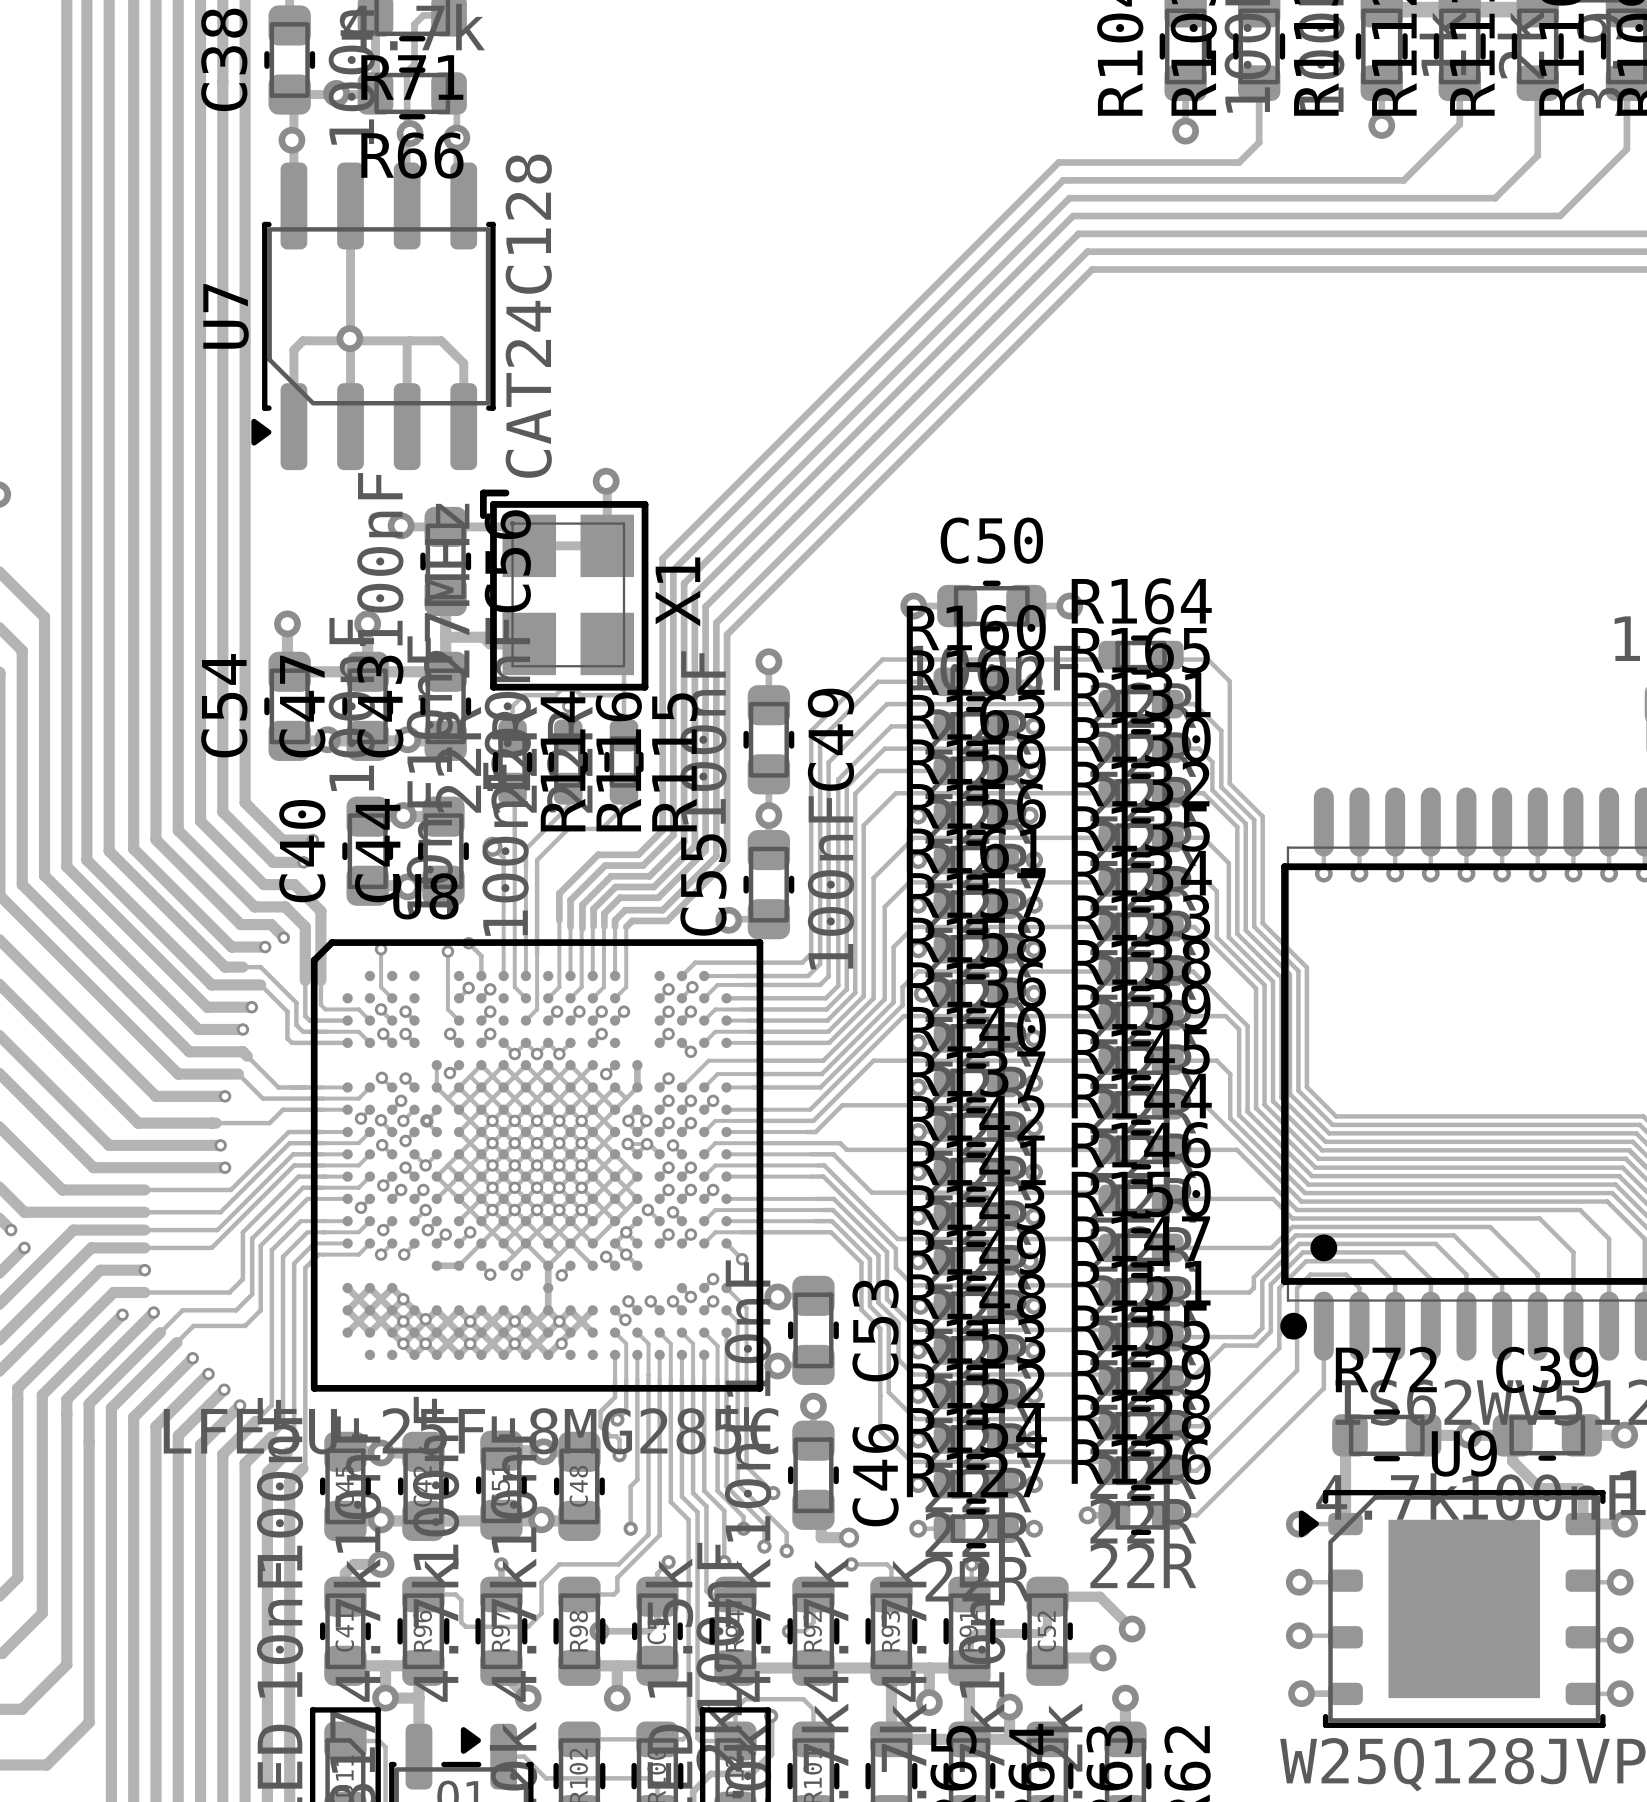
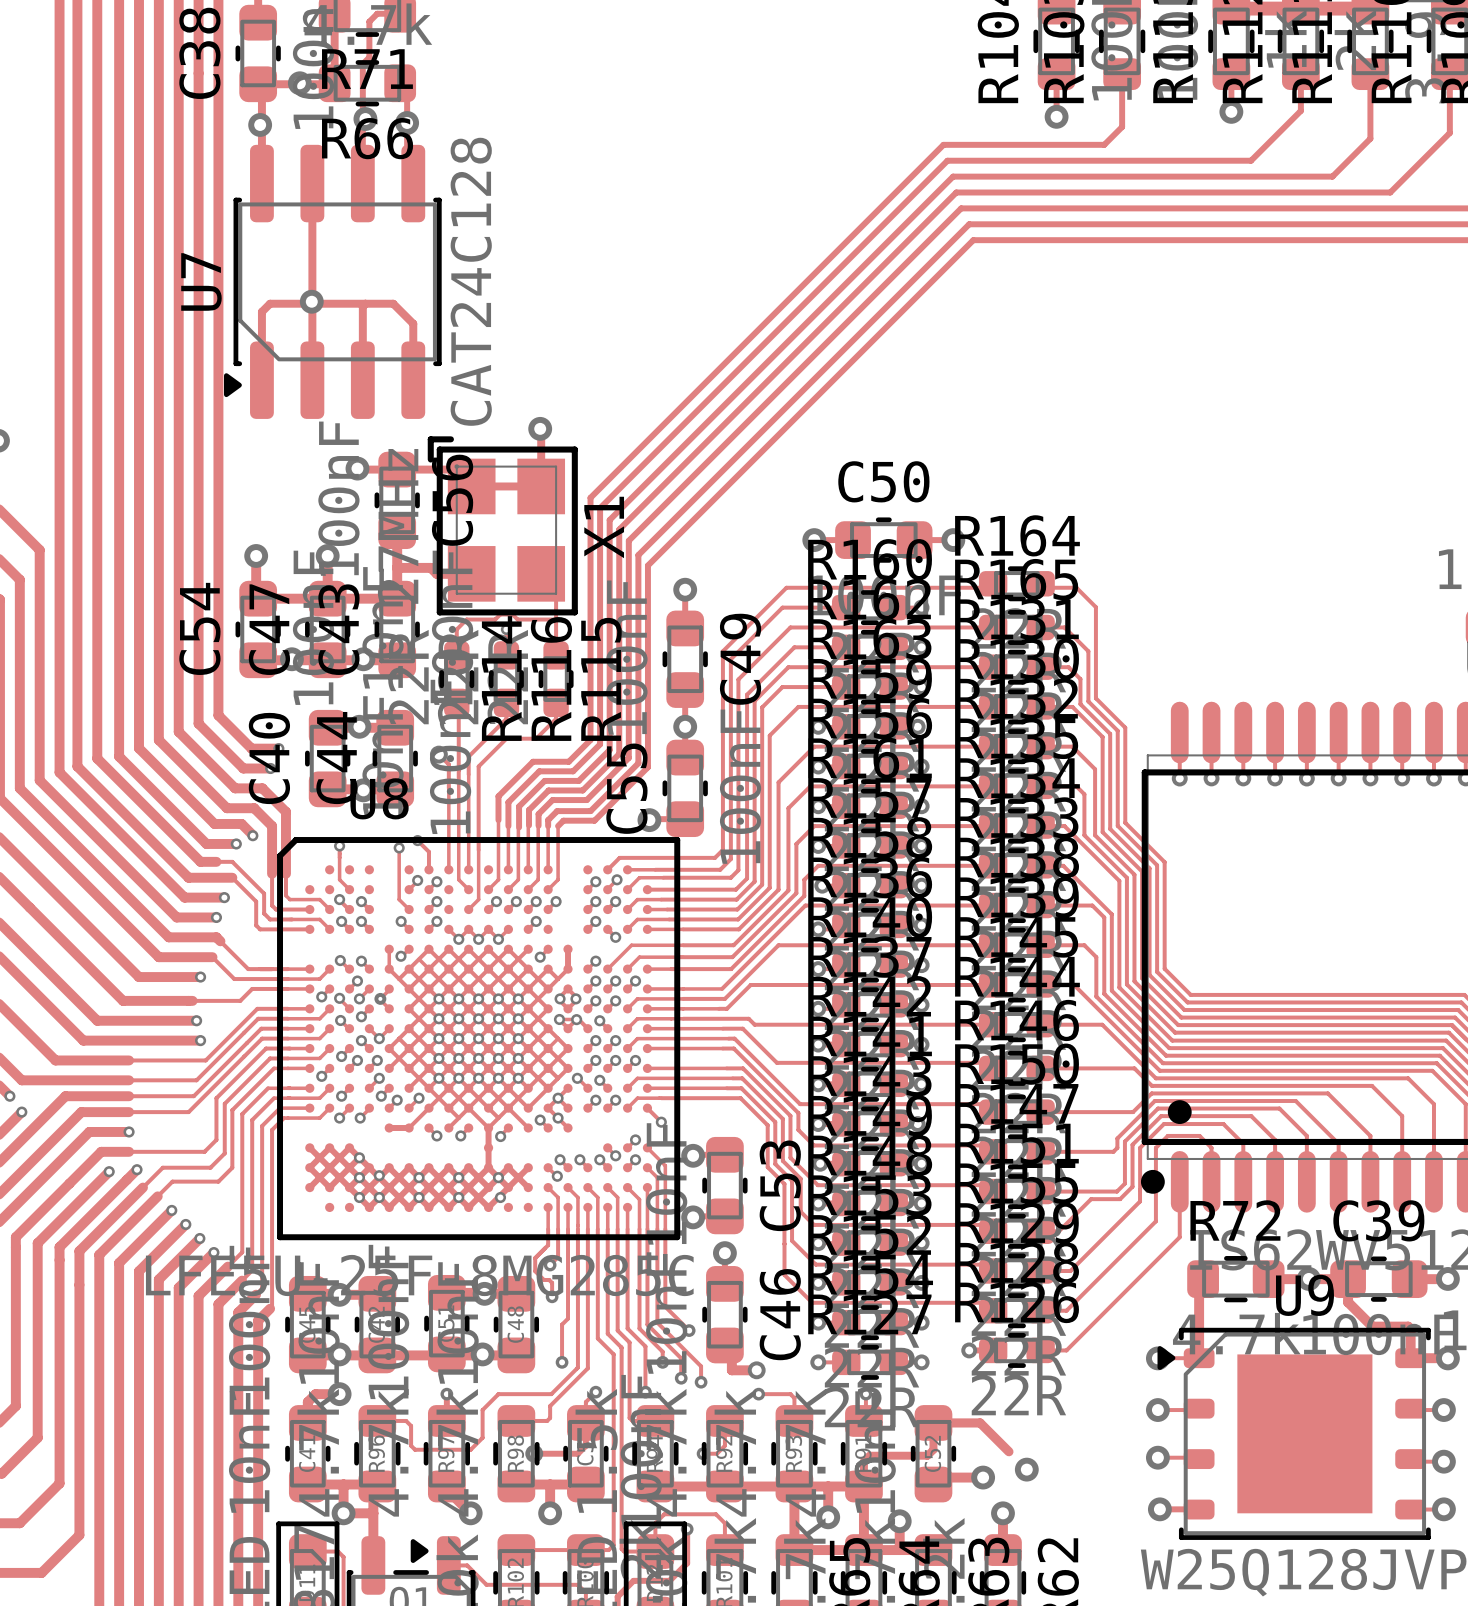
via position: (1132, 1629) -> (1026, 1469)

